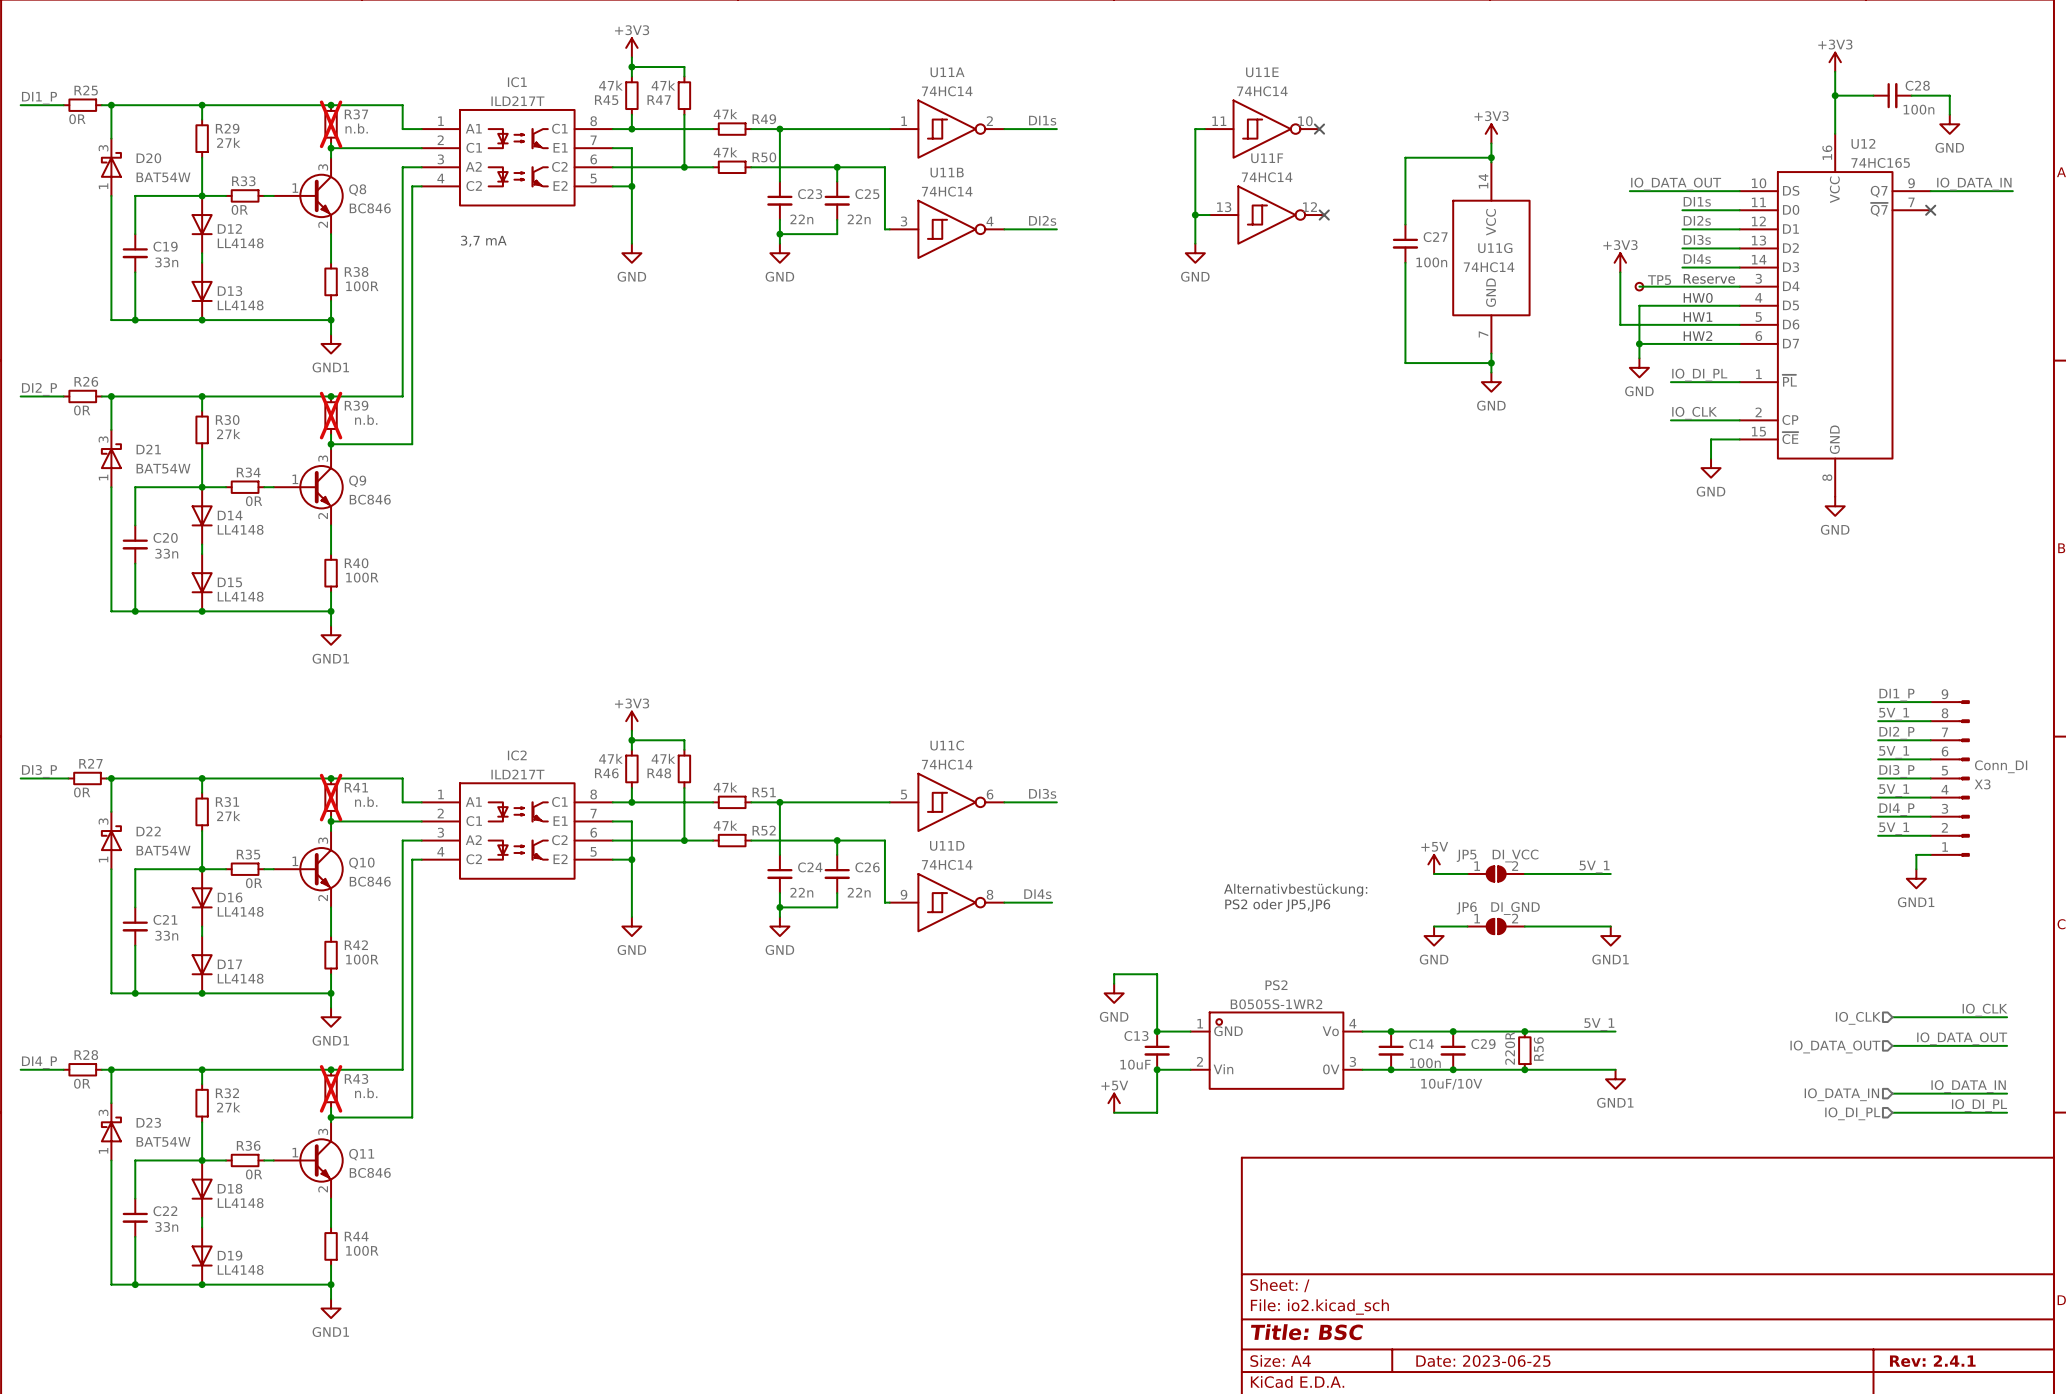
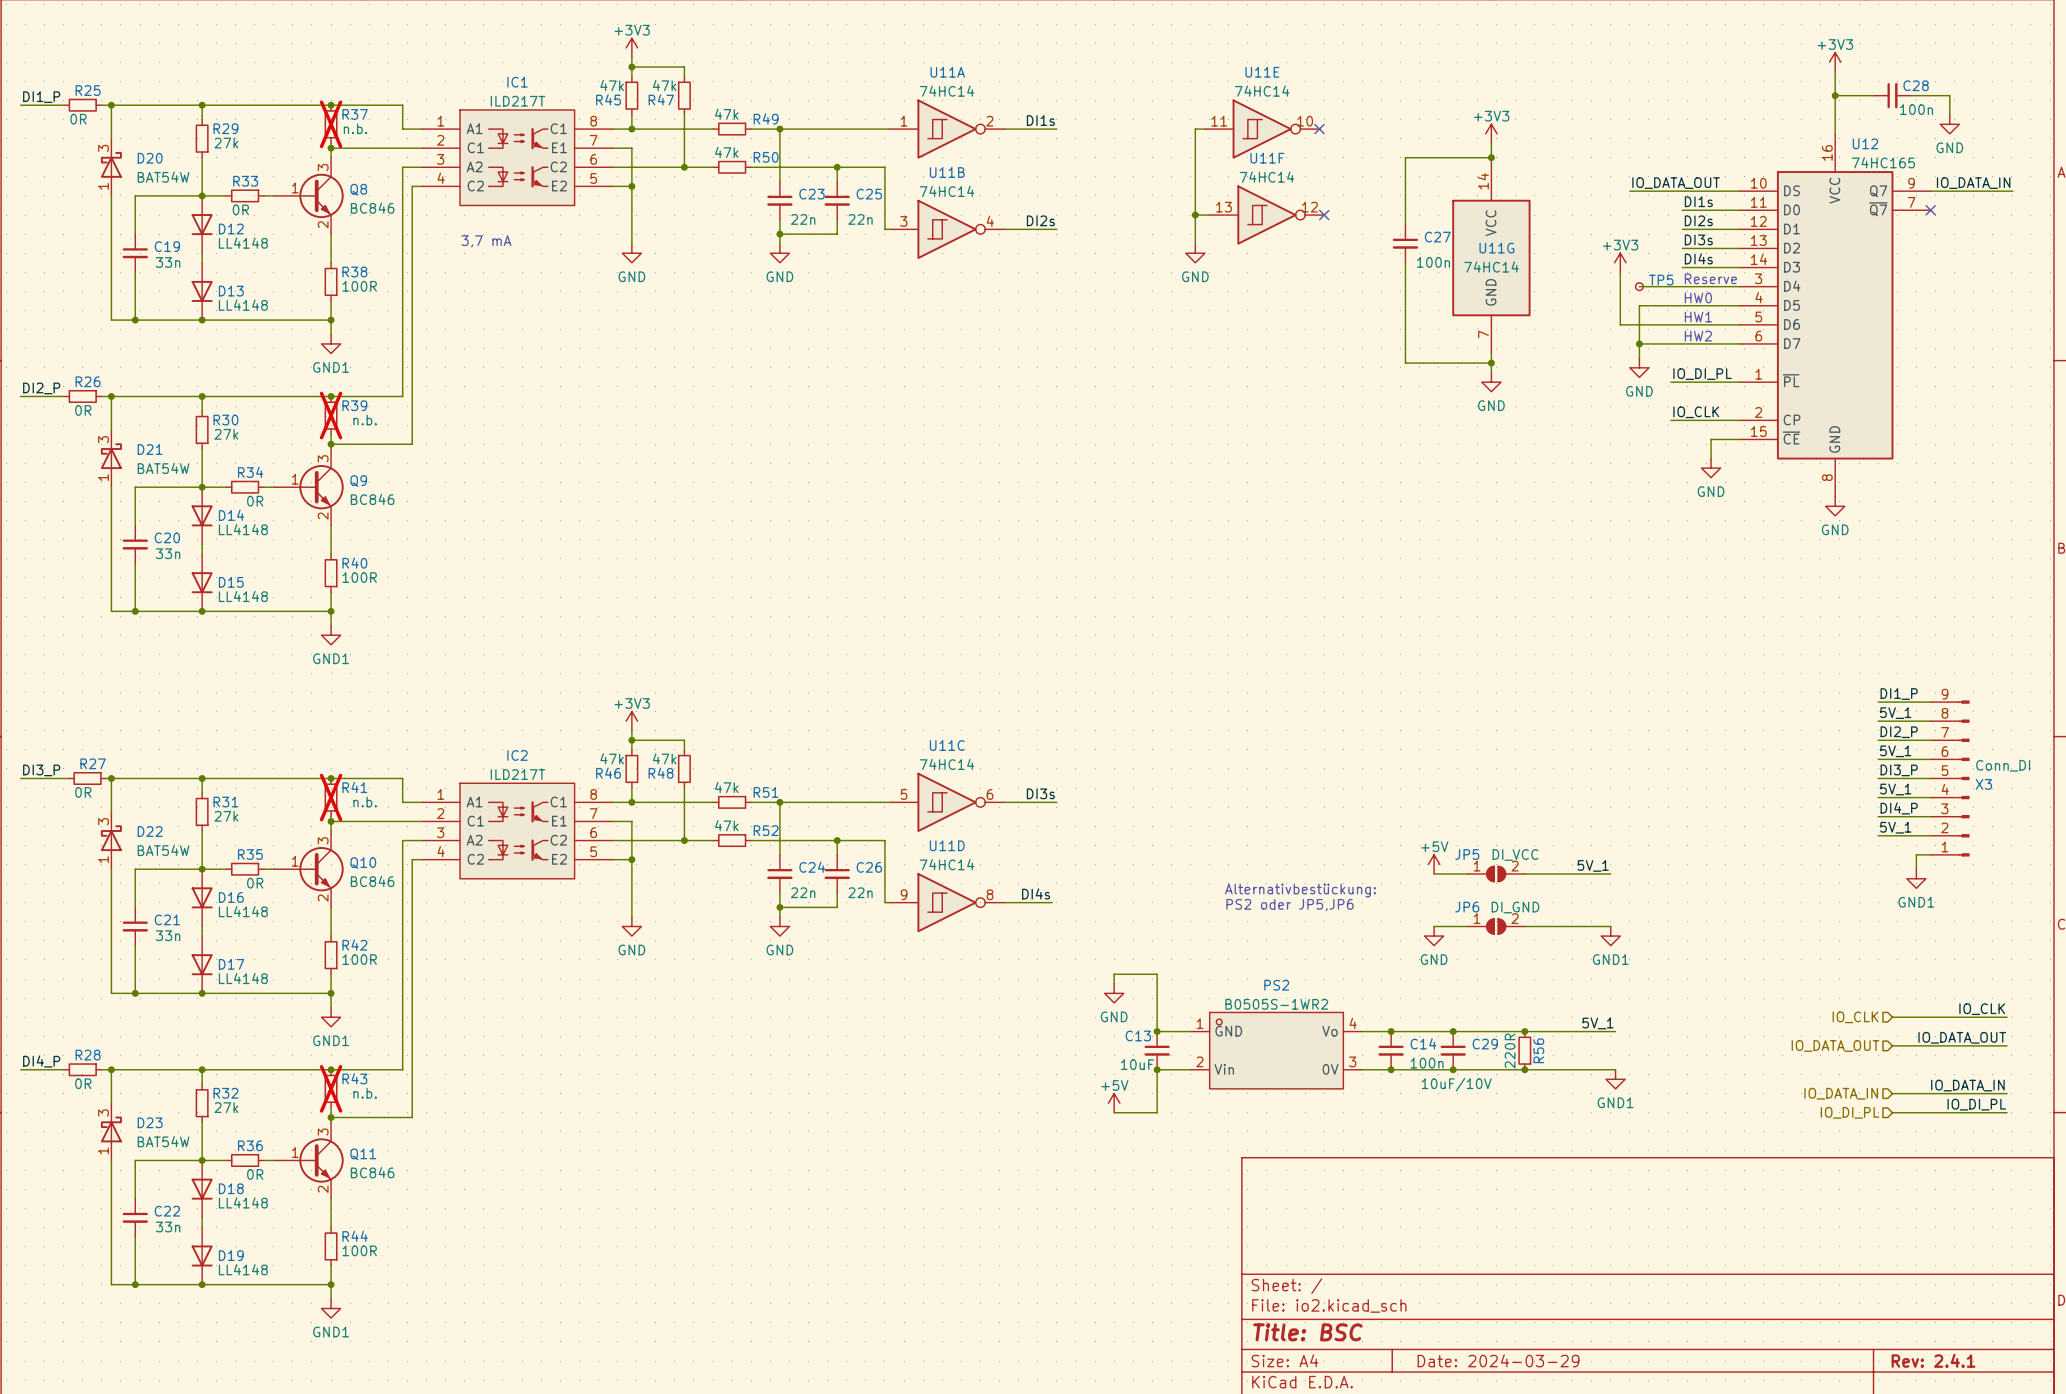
title block: Date: 2023-06-25 (1483, 1361) -> Date: 2024-03-29 (1498, 1360)

